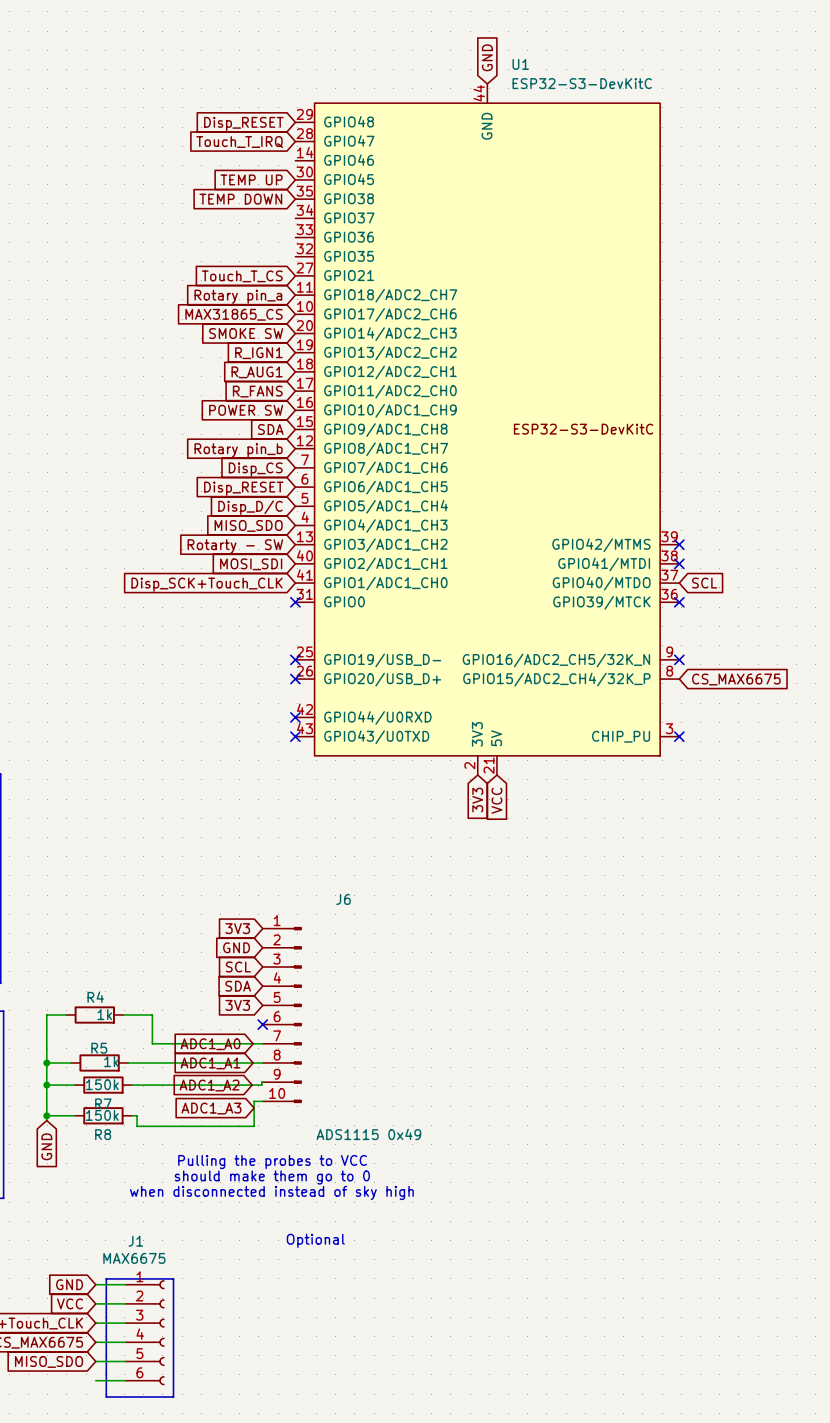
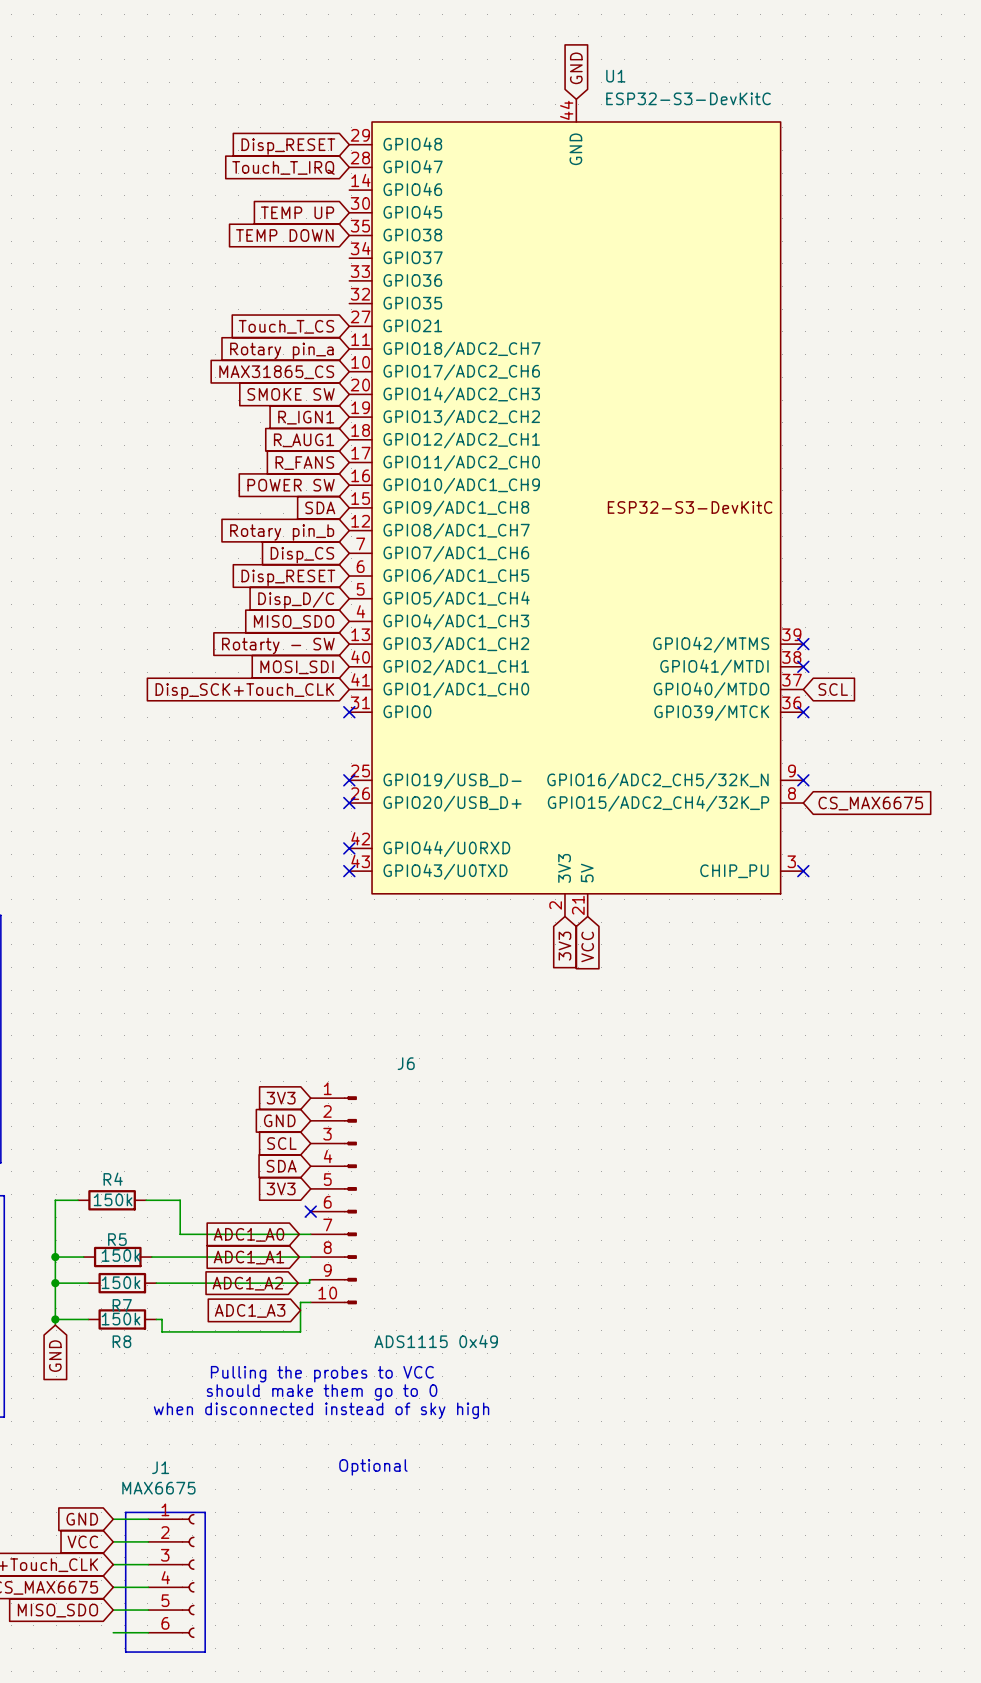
R4 value: 1k (104, 1014) -> 150k (113, 1199)
R5 value: 1k (111, 1061) -> 150k (121, 1255)

